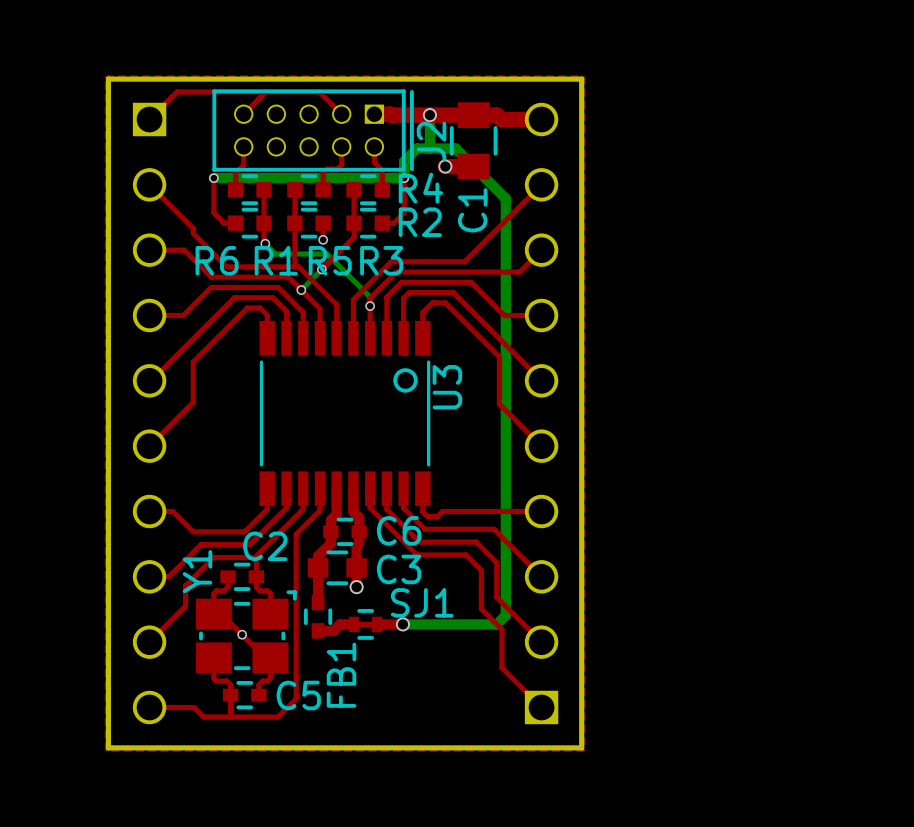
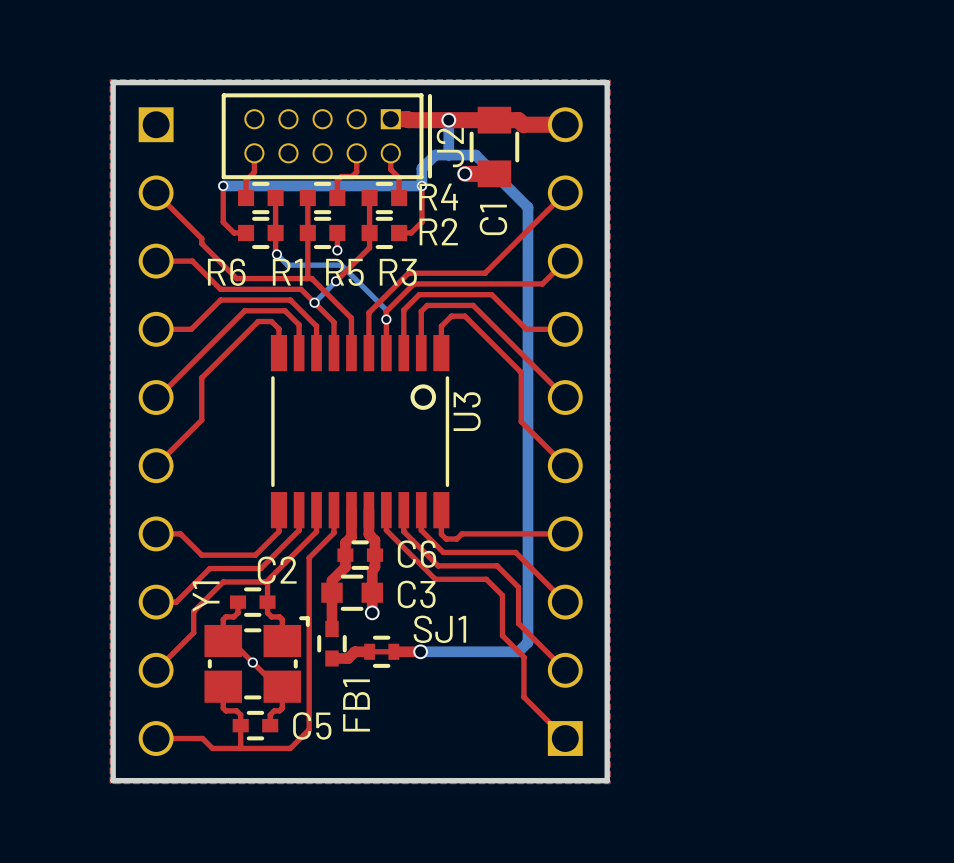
top track: (265, 91) (243, 114) -> none
top track: (341, 114) (319, 91) (177, 91) (149, 119) -> none

